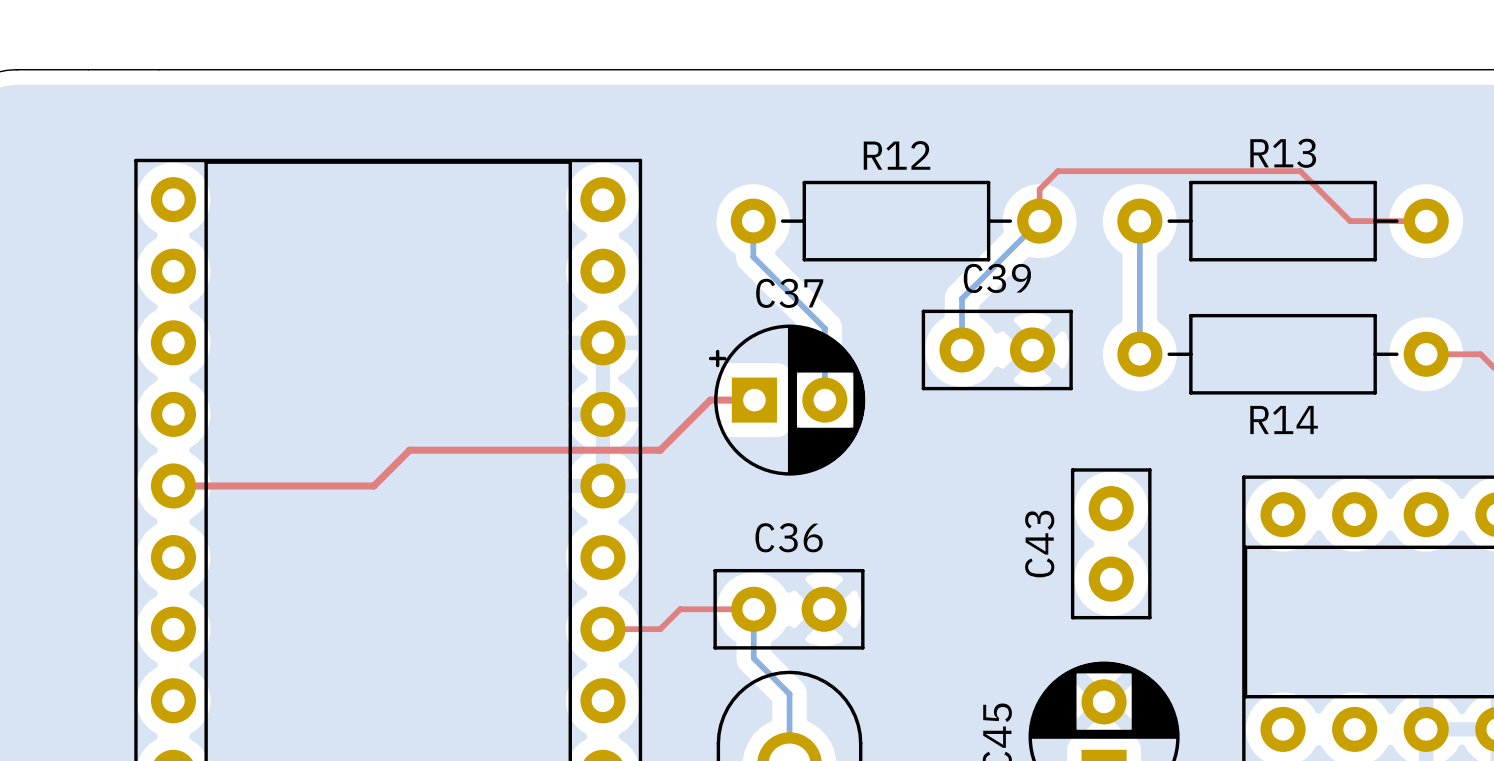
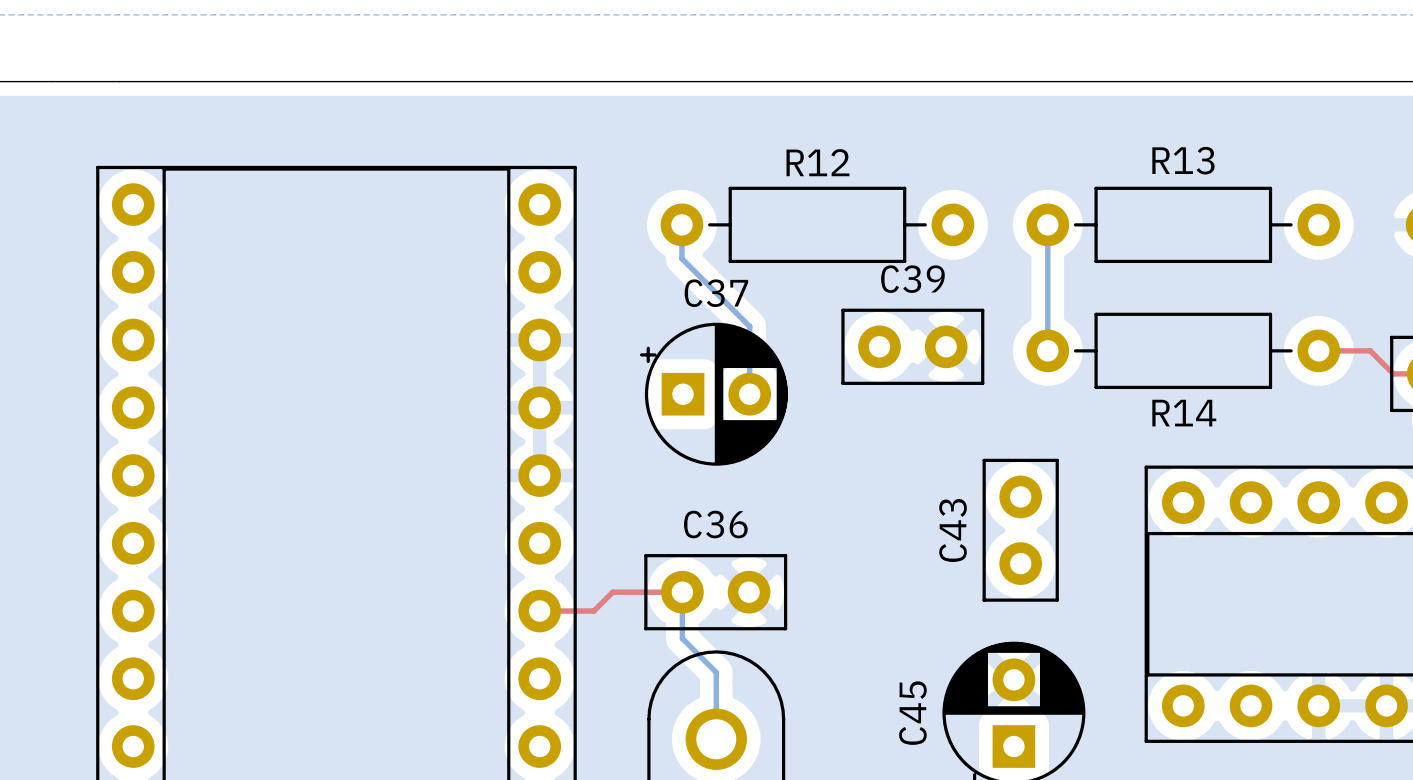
bottom track: (1039, 221) (962, 298) (962, 349) -> none
top track: (1039, 221) (1039, 189) (1057, 171) (1300, 171) (1350, 221) (1426, 221) -> none
top track: (754, 400) (710, 400) (660, 450) (409, 450) (373, 485) (173, 485) -> none

